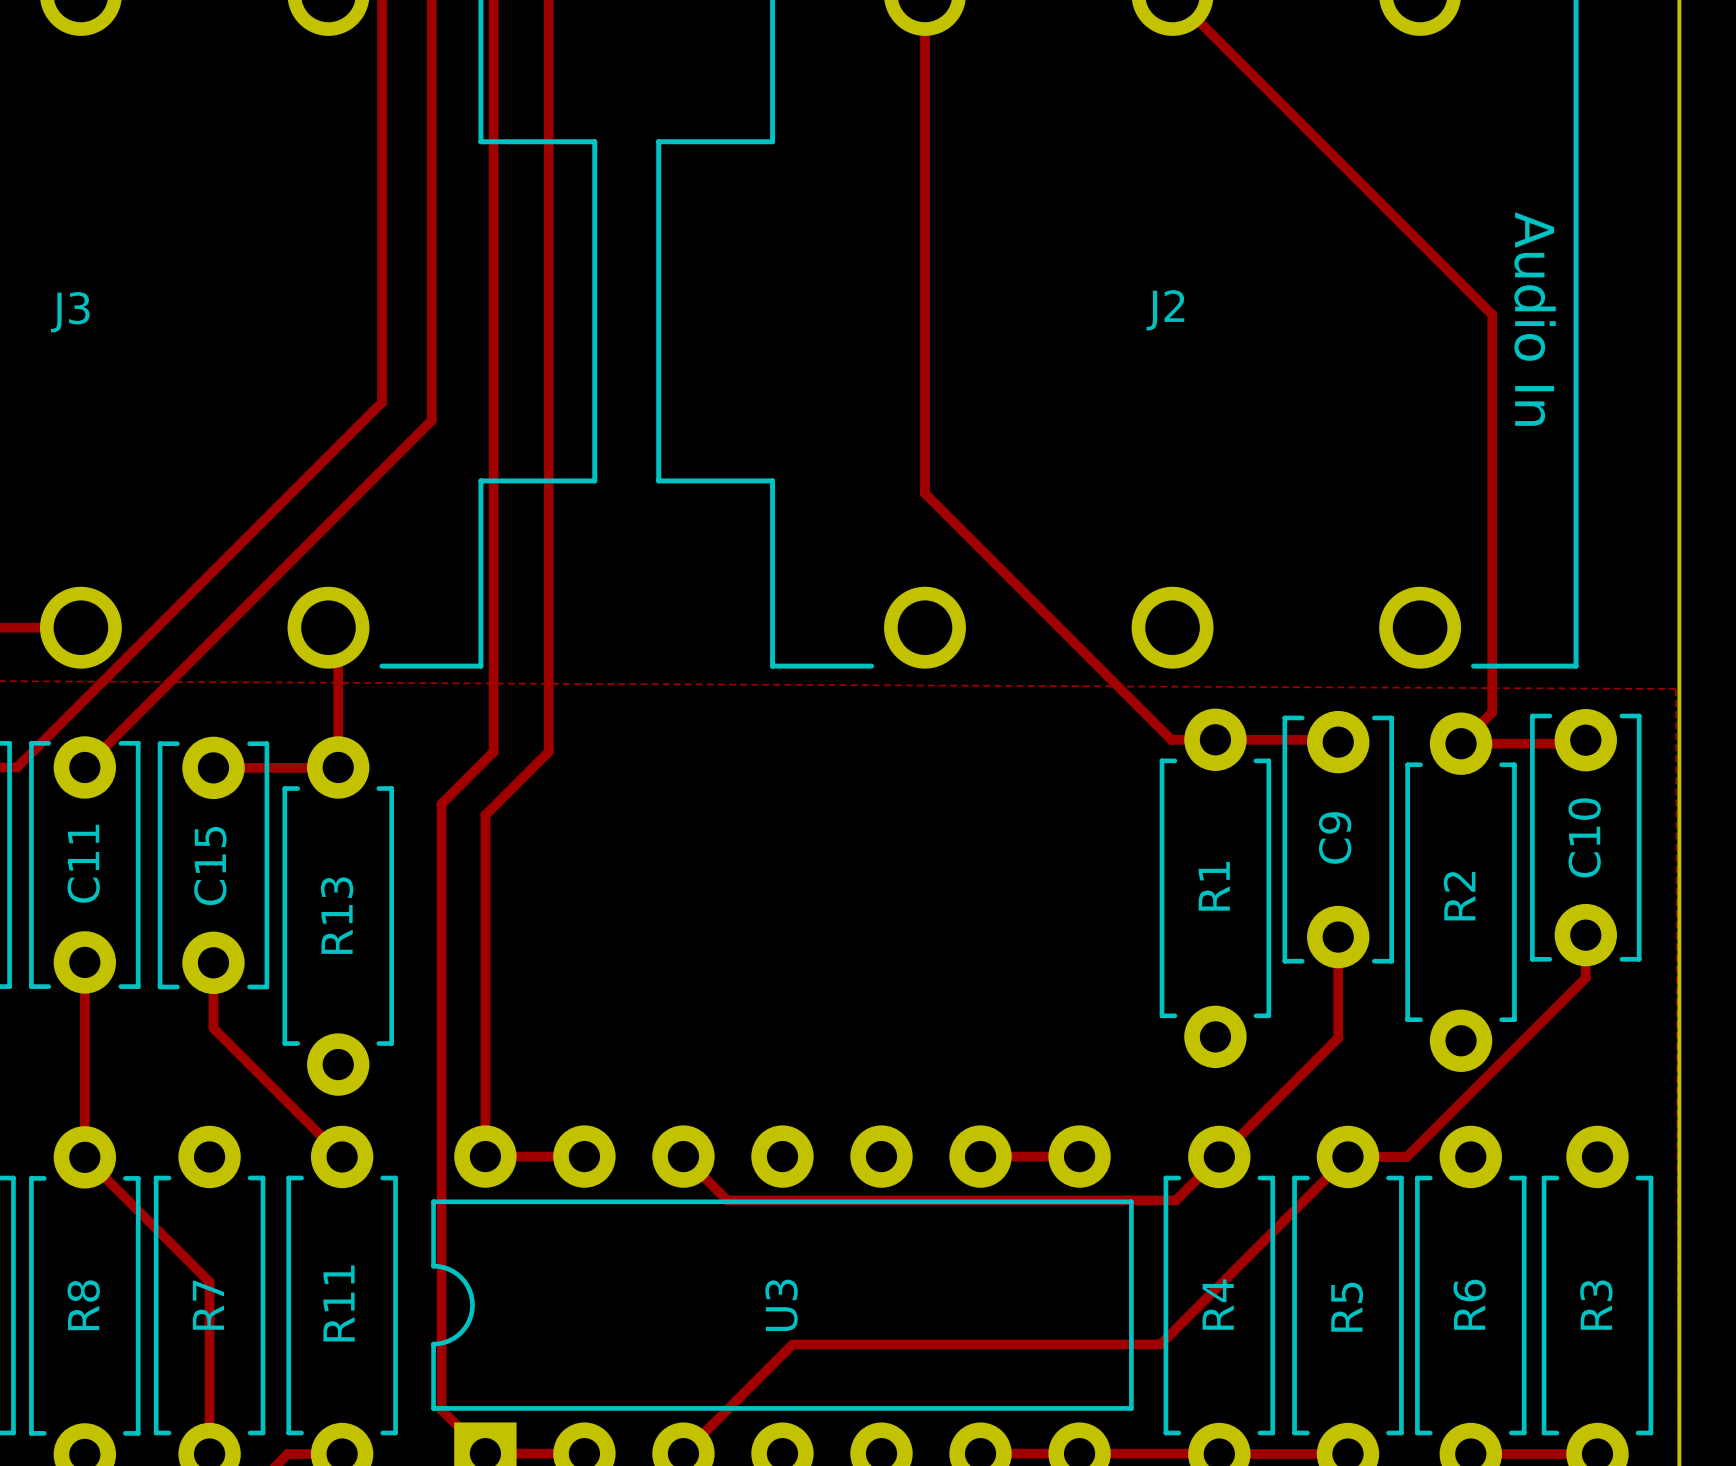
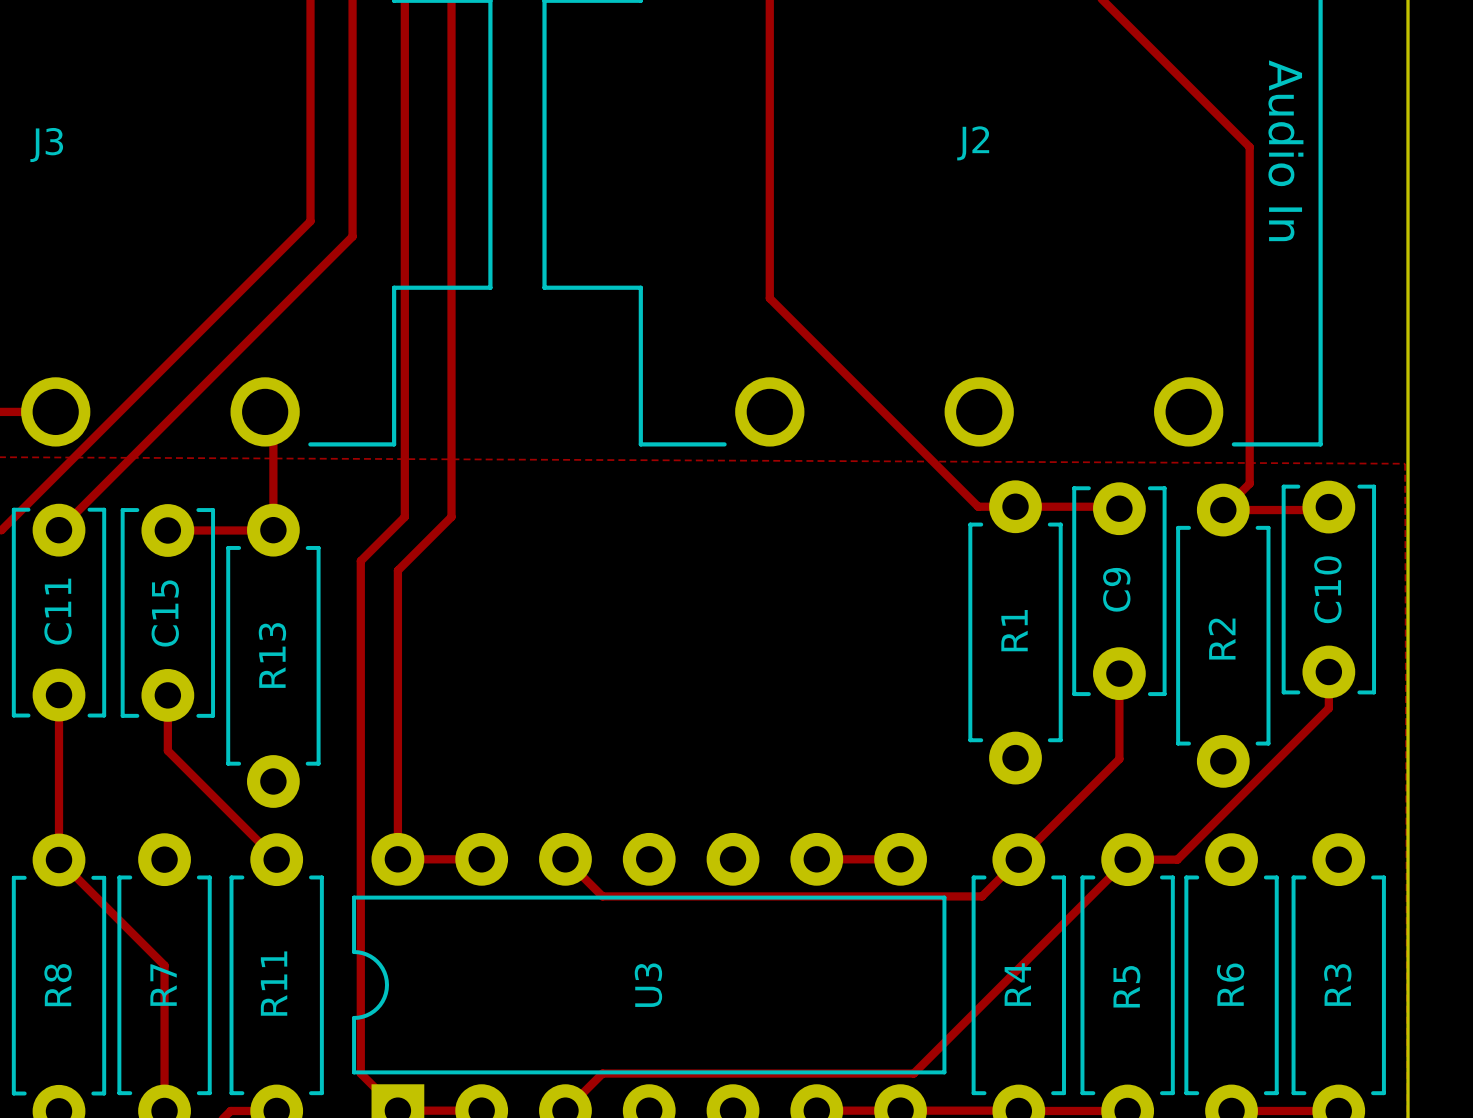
top track: (1160, 1344) (792, 1344) (727, 1409) -> (969, 1018) (913, 1073) (602, 1073)

